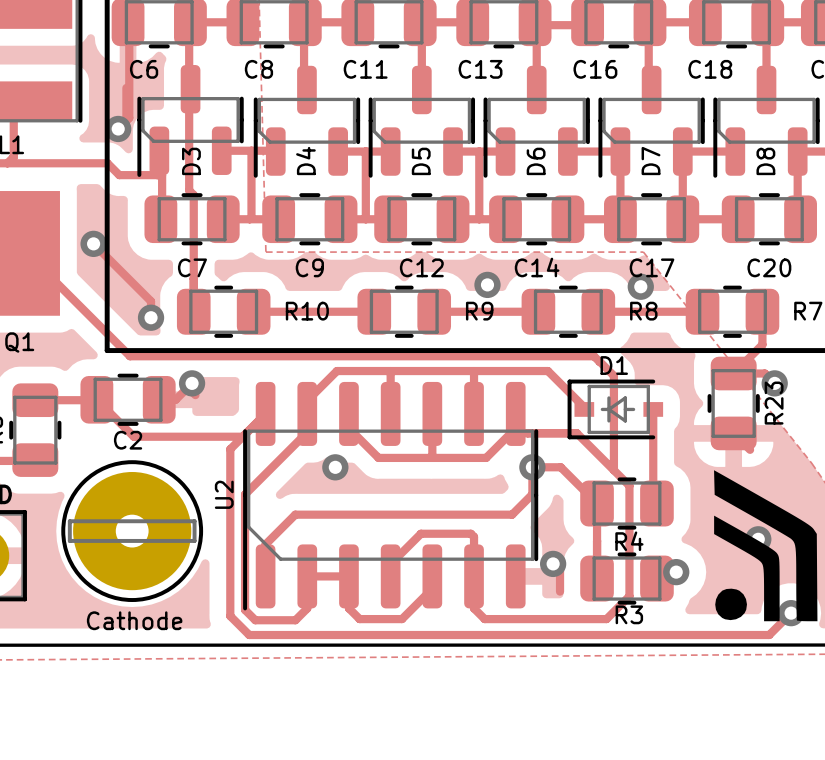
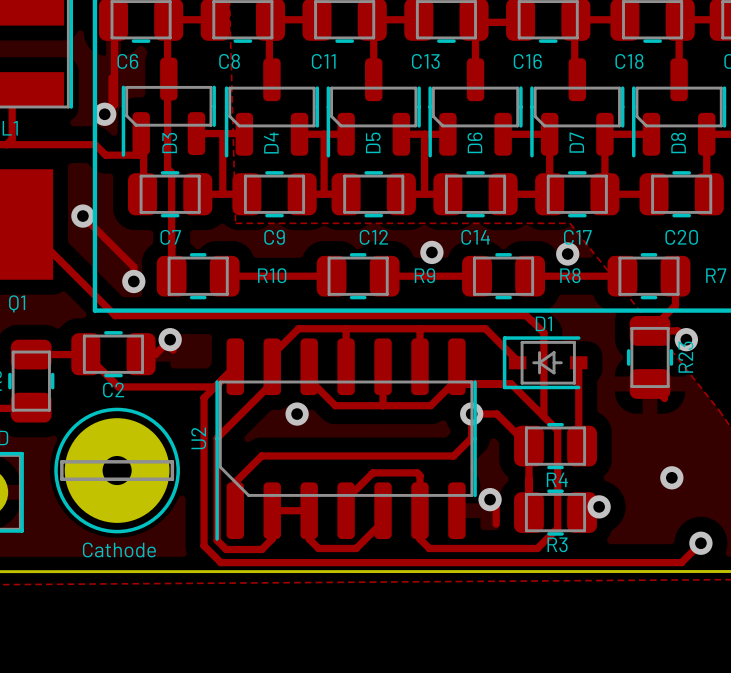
drawing: [714, 470, 818, 622] -> none

